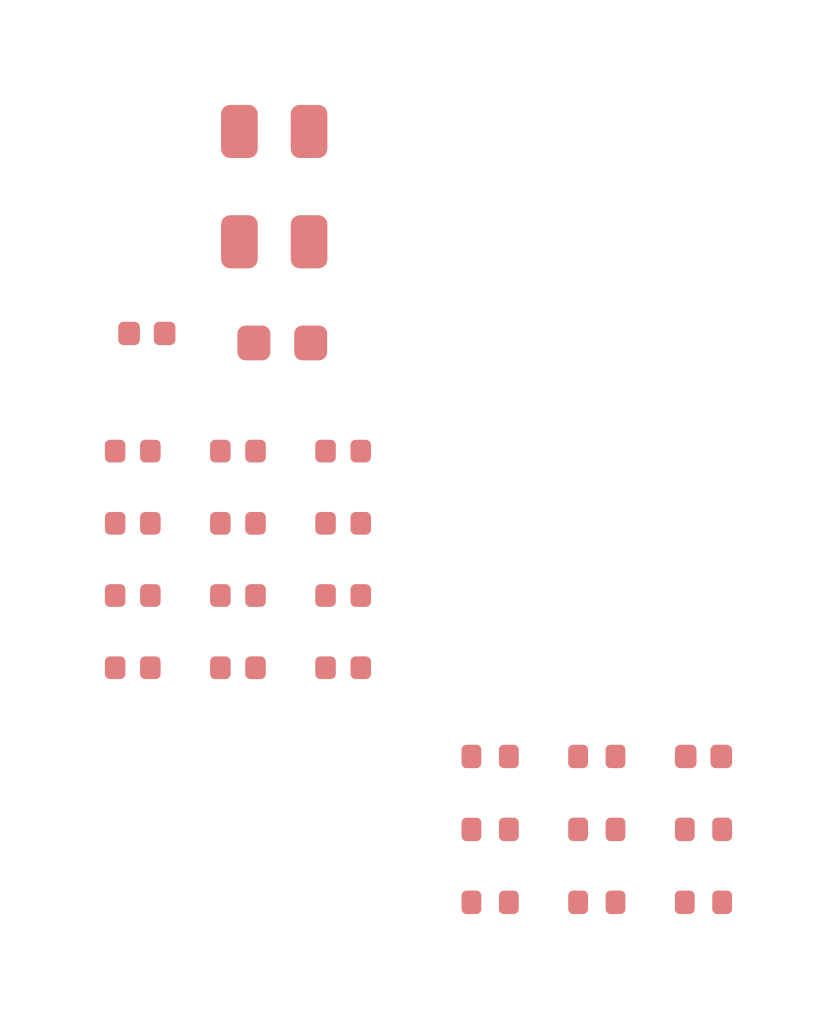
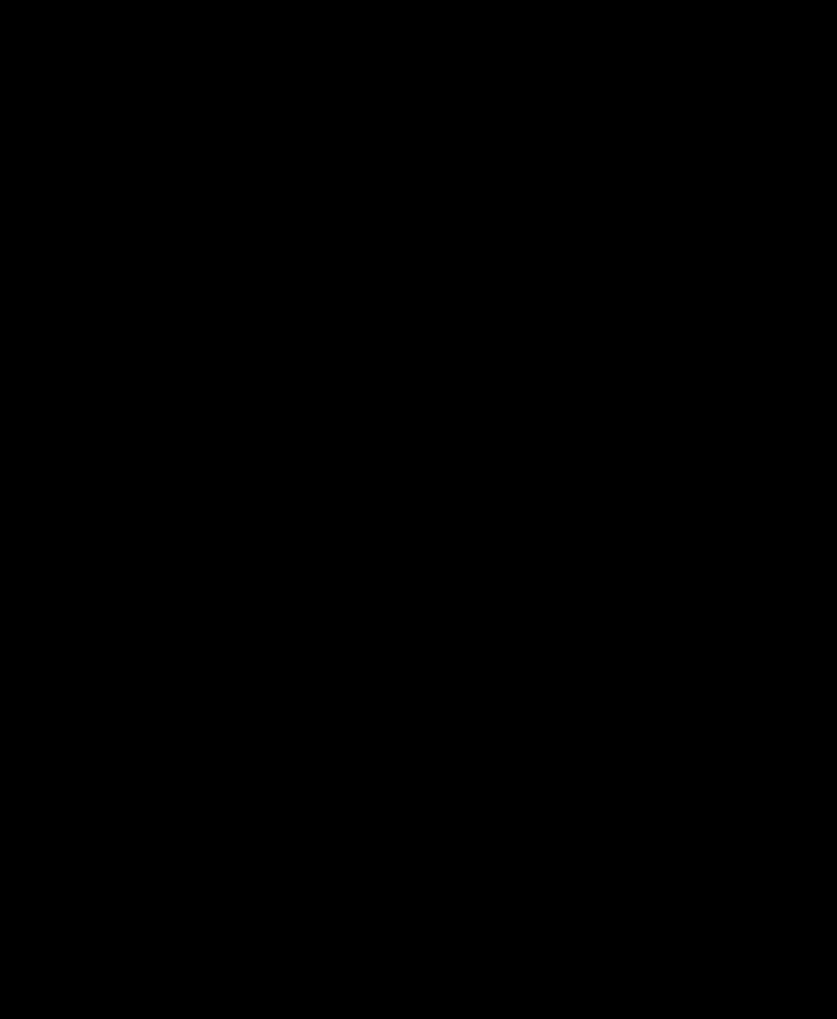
part: (274, 131) -> none
part: (274, 241) -> none
part: (146, 333) -> none
part: (282, 342) -> none
part: (132, 451) -> none
part: (237, 451) -> none
part: (343, 451) -> none
part: (132, 523) -> none
part: (237, 523) -> none
part: (343, 523) -> none
part: (132, 595) -> none
part: (237, 595) -> none
part: (343, 595) -> none
part: (132, 667) -> none
part: (237, 667) -> none
part: (343, 667) -> none
part: (490, 756) -> none
part: (596, 756) -> none
part: (703, 756) -> none
part: (490, 829) -> none
part: (596, 829) -> none
part: (703, 829) -> none
part: (490, 902) -> none
part: (596, 902) -> none
part: (703, 902) -> none

